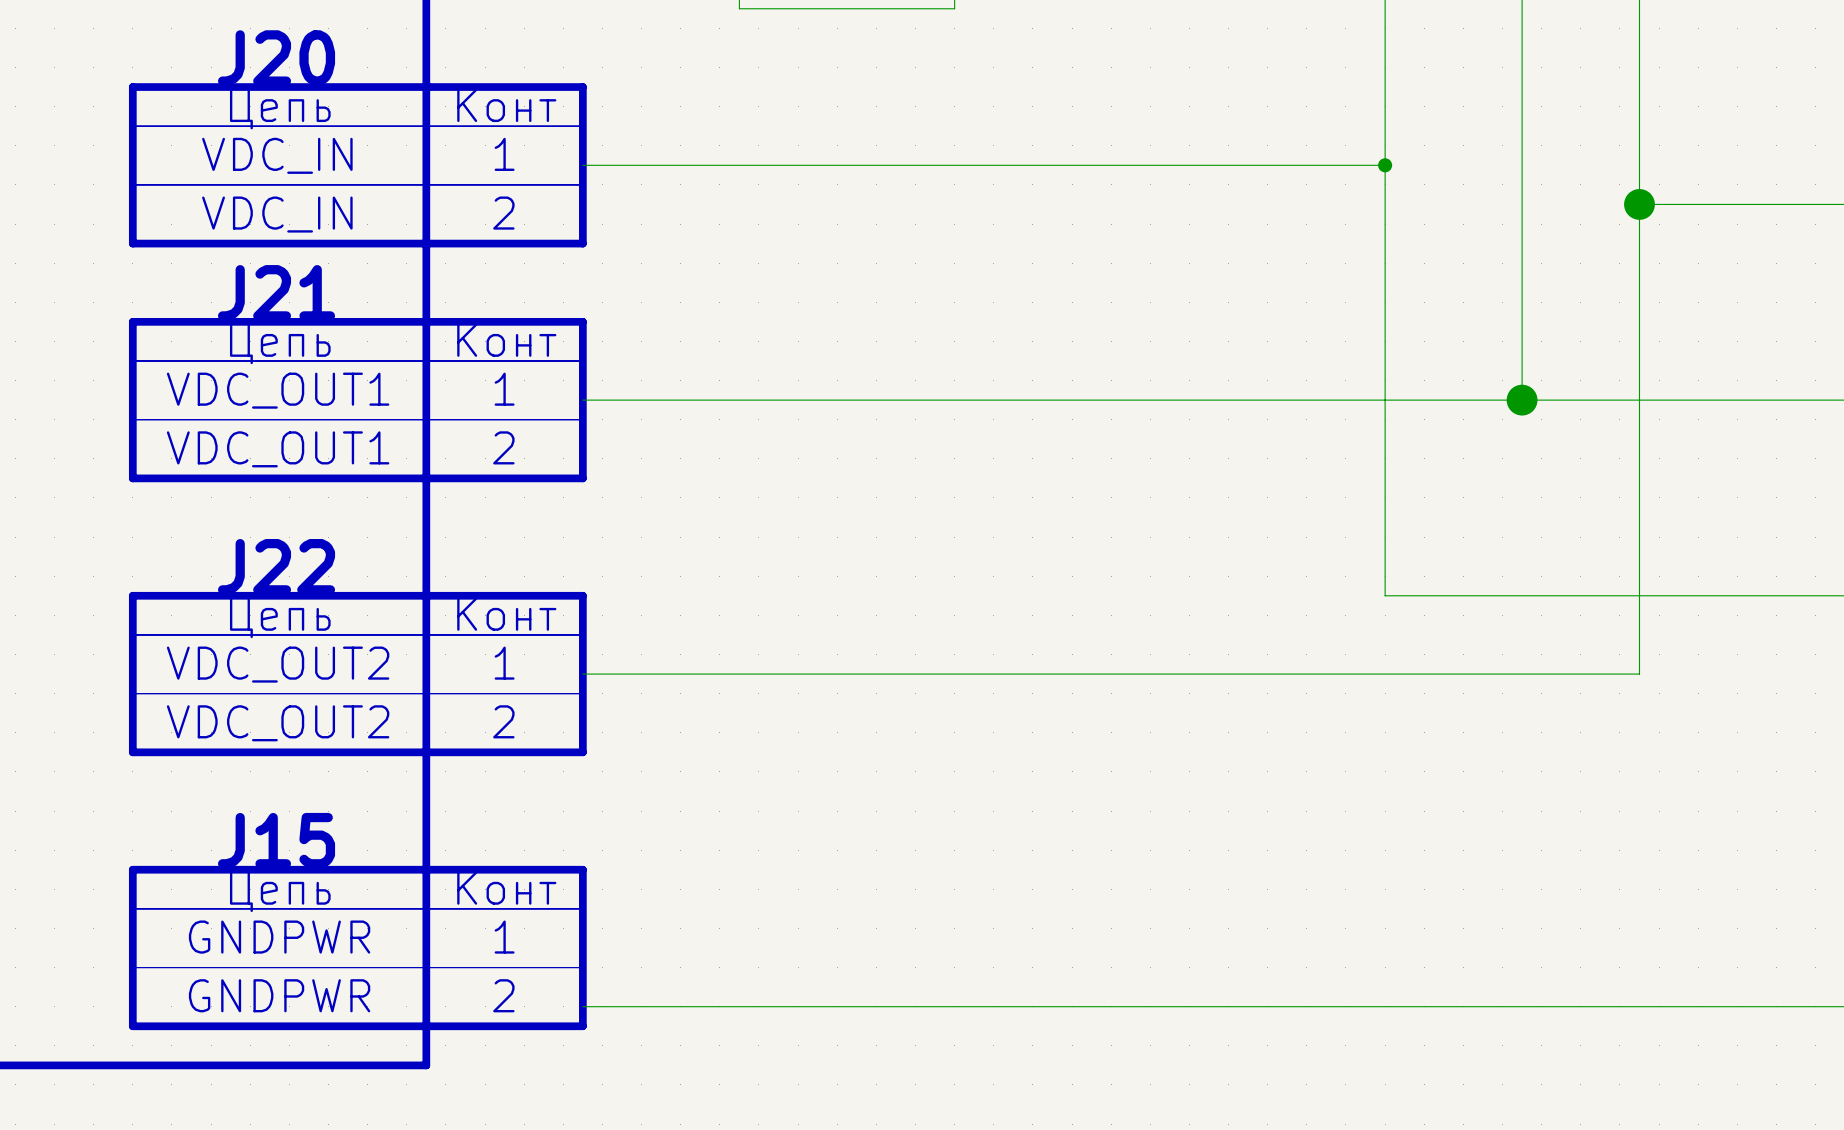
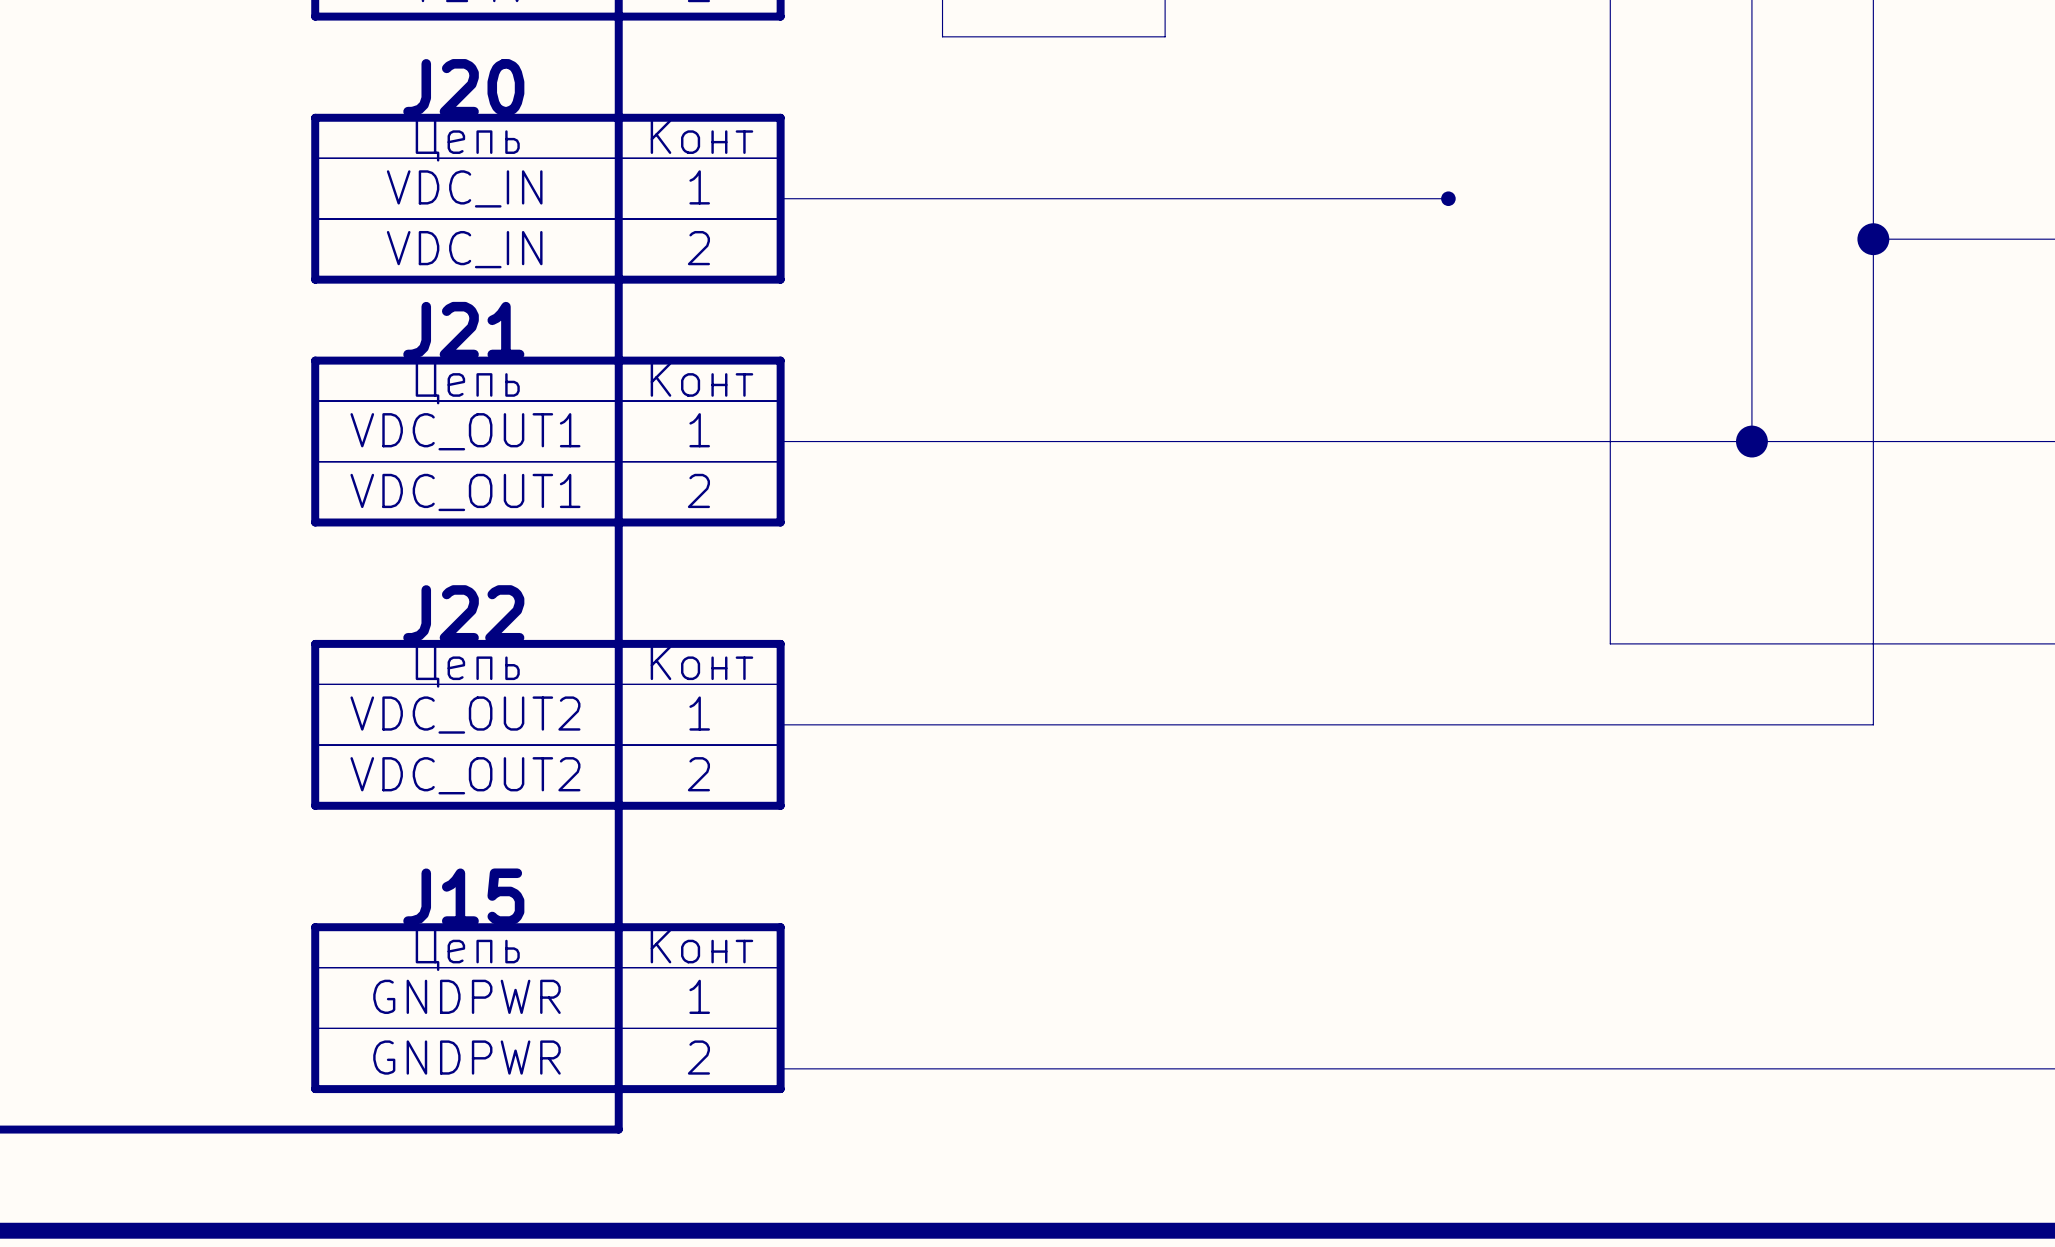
wire: (1228, 165) (1385, 165) -> none
junction: none -> (1448, 198)
junction: (1385, 165) -> none

